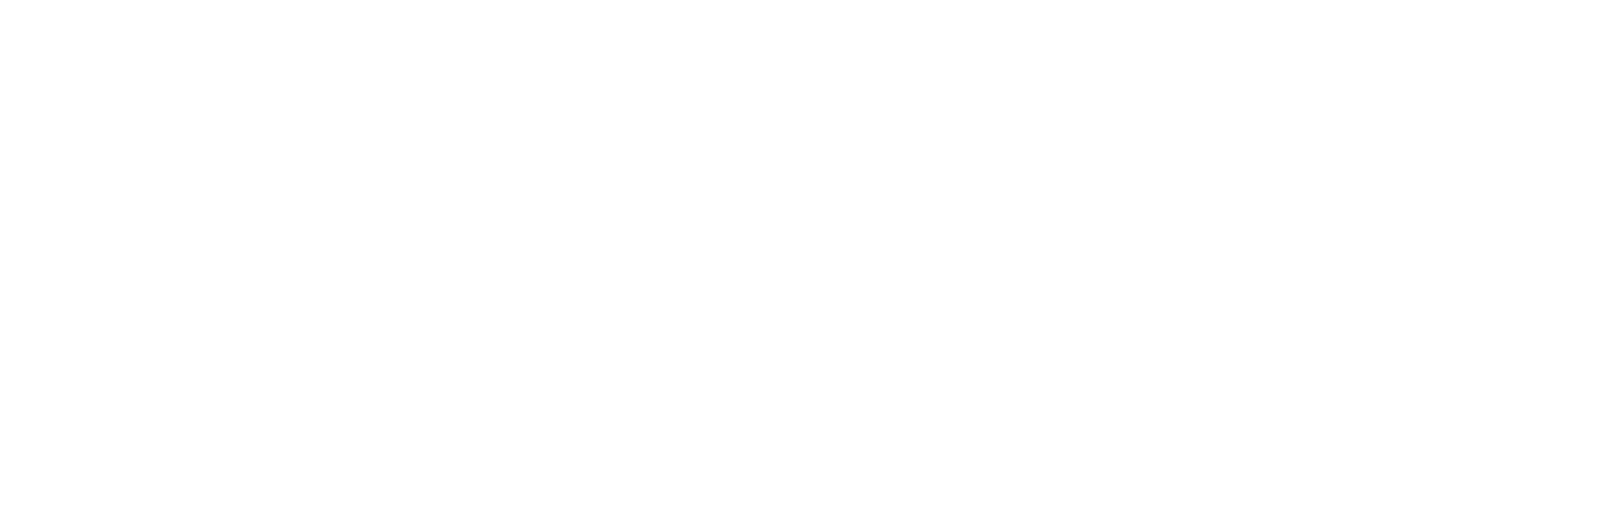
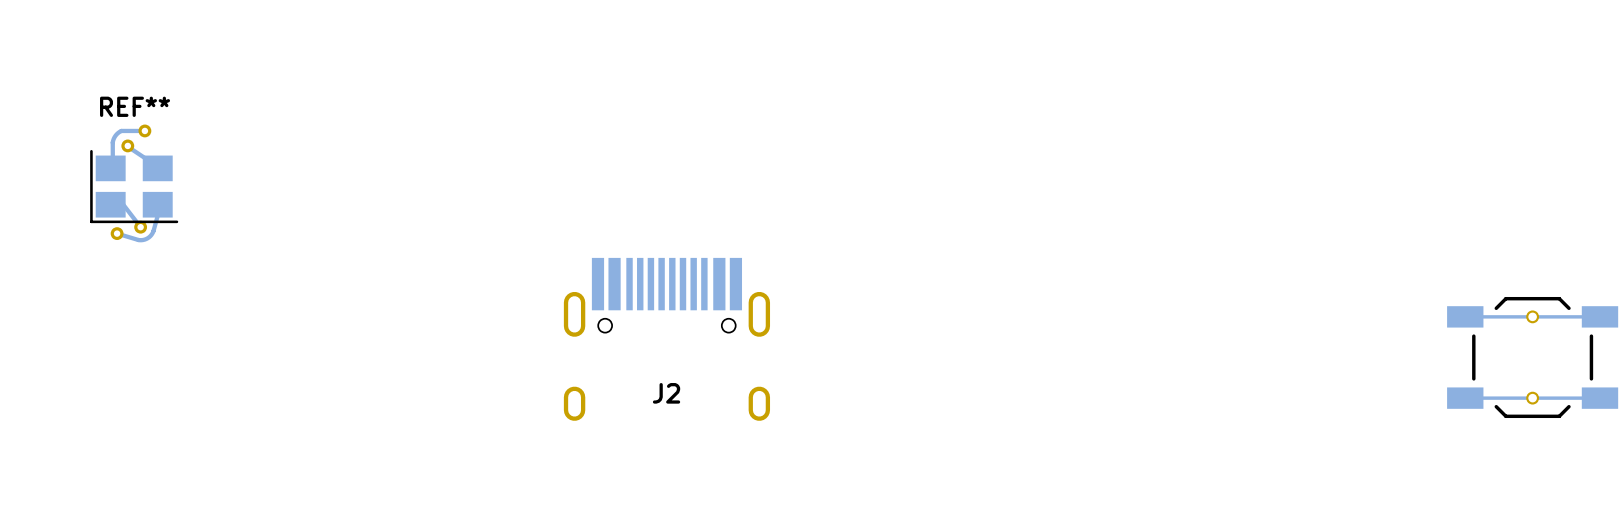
part: none -> (134, 183)
J2: none -> (666, 339)
part: none -> (1532, 357)

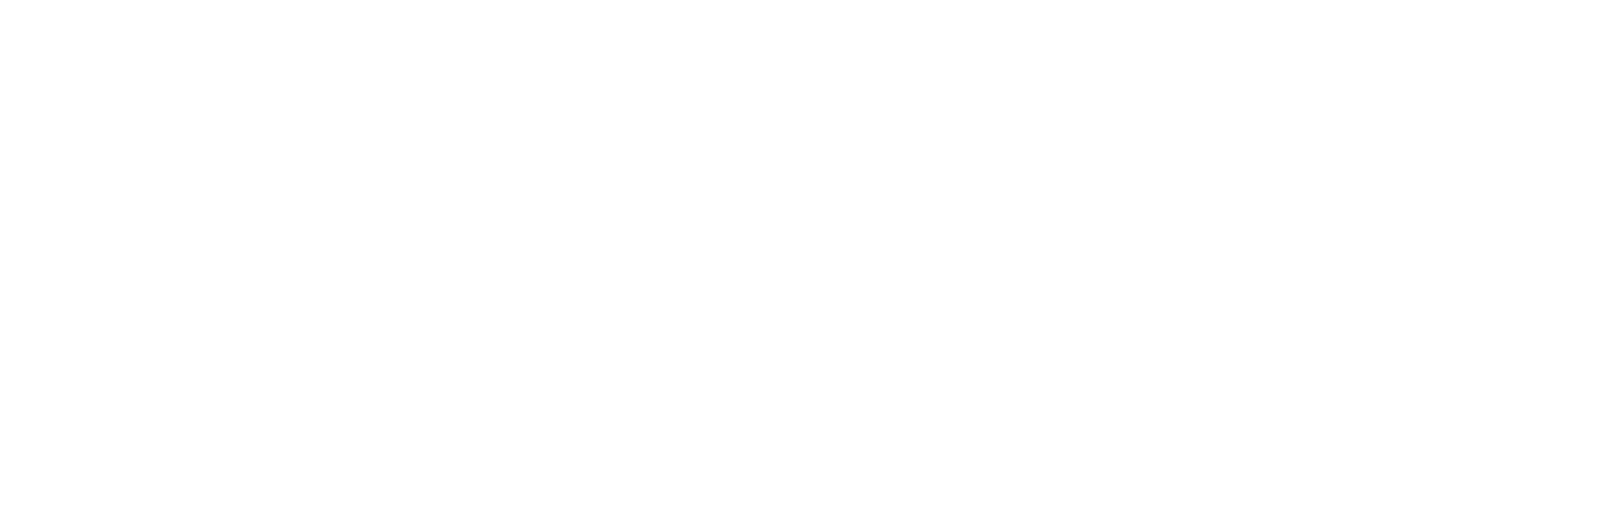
part: (134, 183) -> none
J2: (666, 339) -> none
part: (1532, 357) -> none

